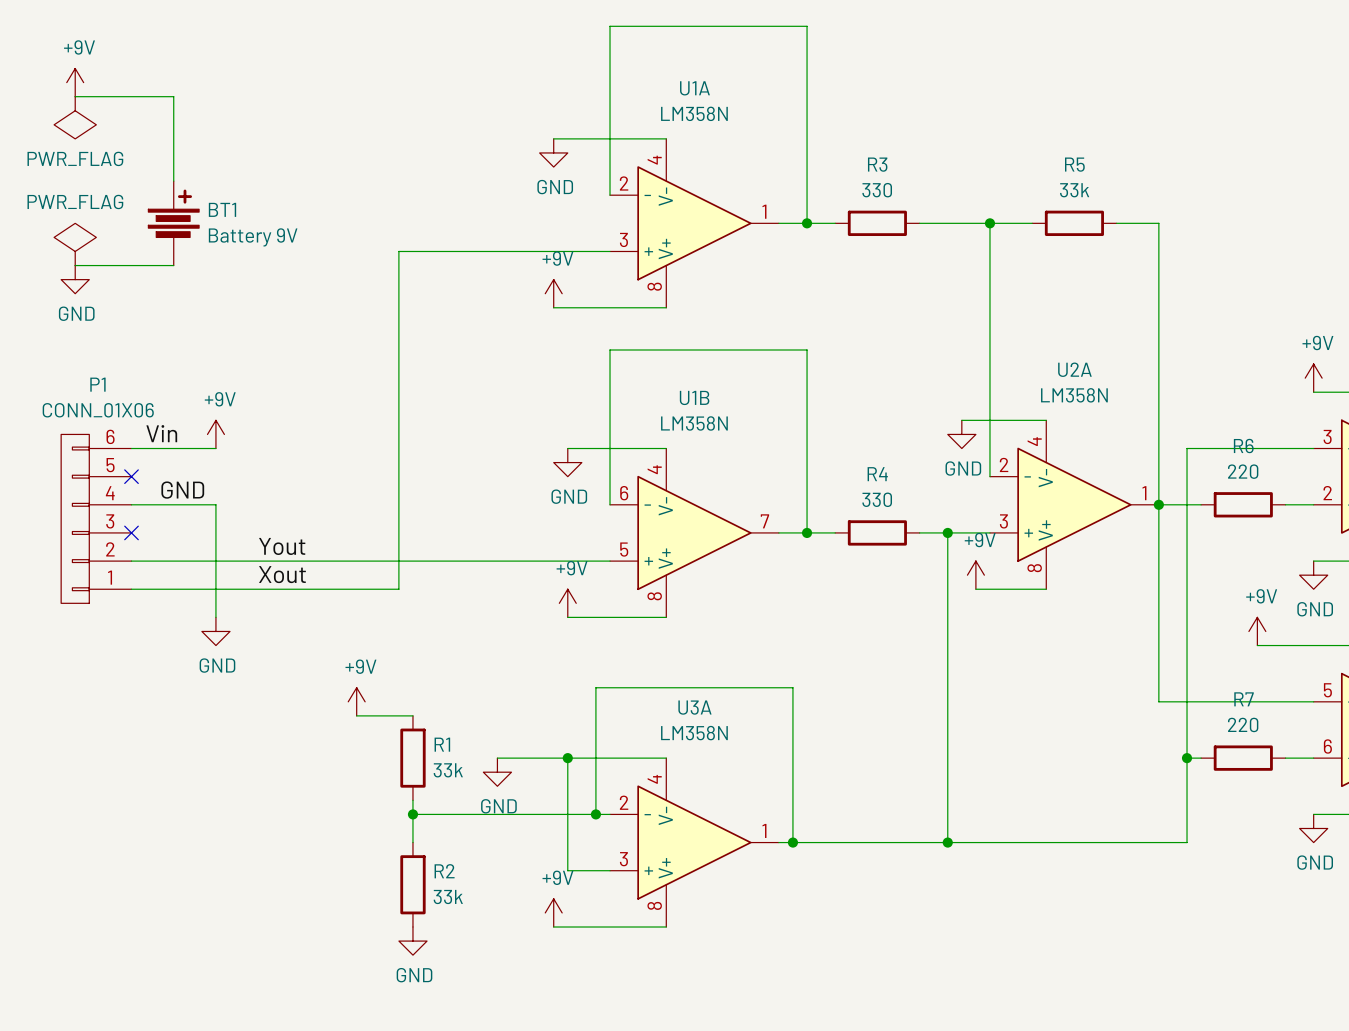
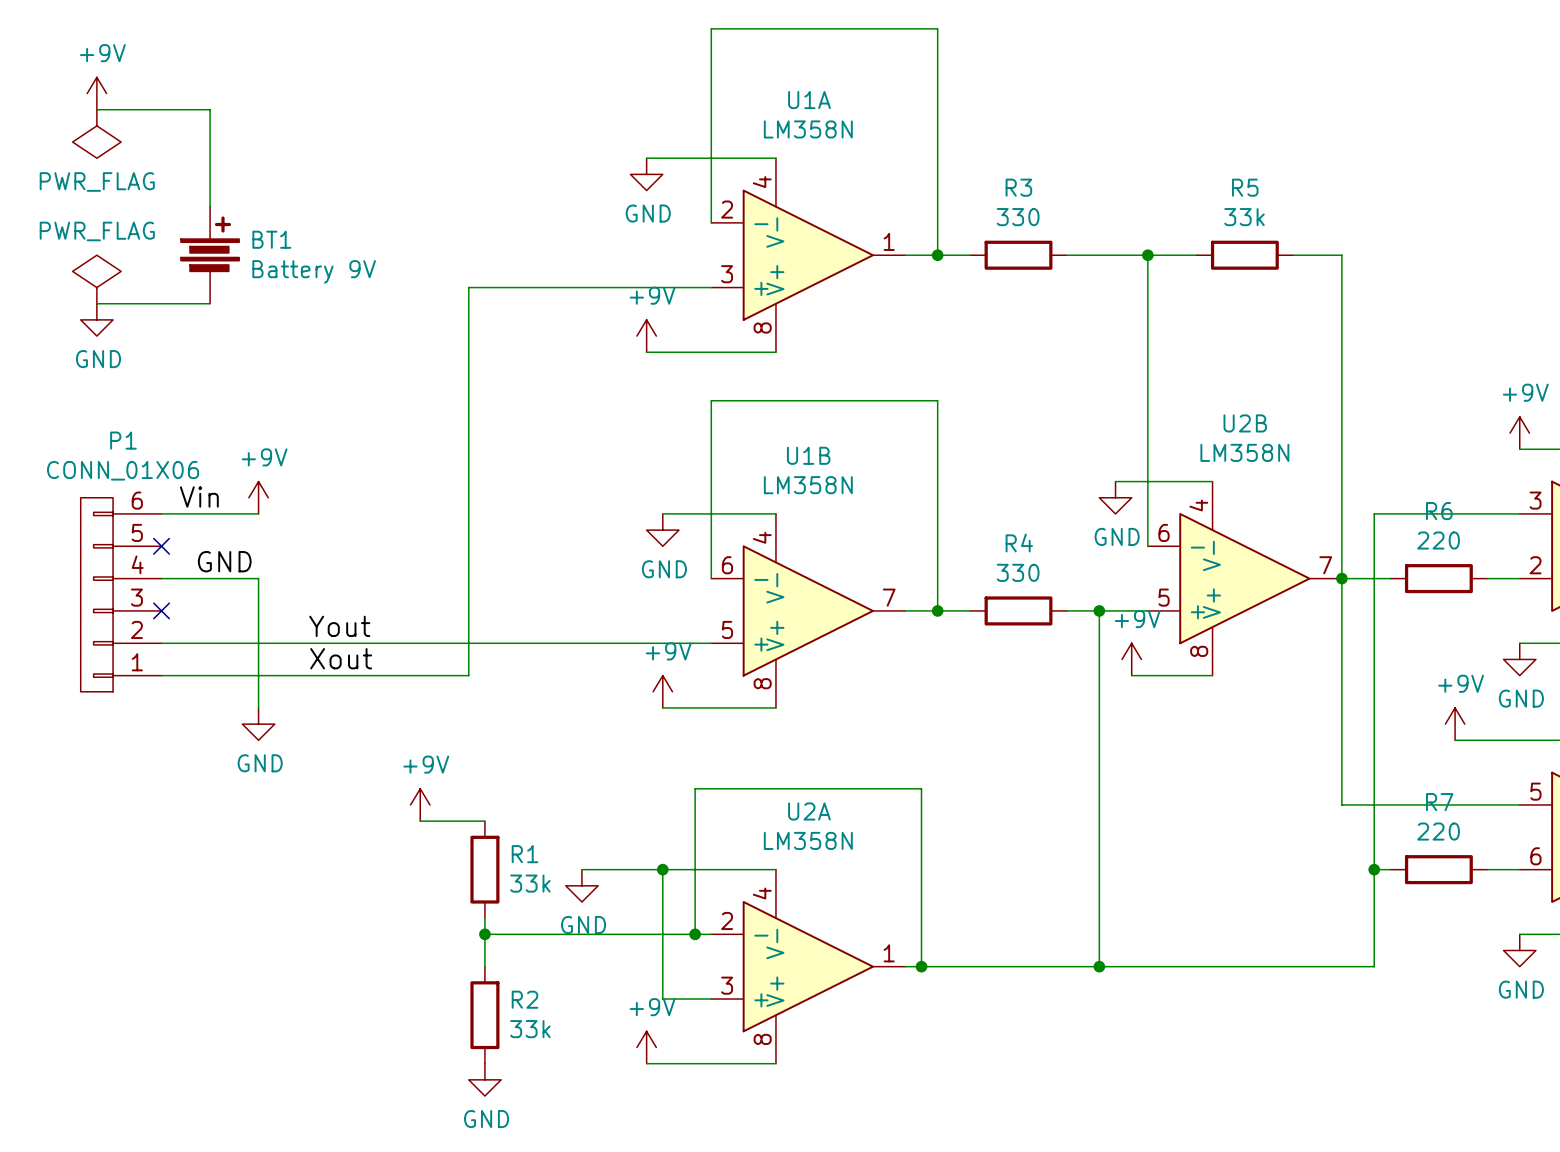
U2A name: U2A (1074, 369) -> U2B (1245, 423)
U2A pin number: 2 (1004, 464) -> 6 (1164, 532)
U2A pin number: 1 (1144, 493) -> 7 (1325, 565)
U2A pin number: 3 (1003, 521) -> 5 (1164, 597)
U3A name: U3A (694, 707) -> U2A (809, 811)

